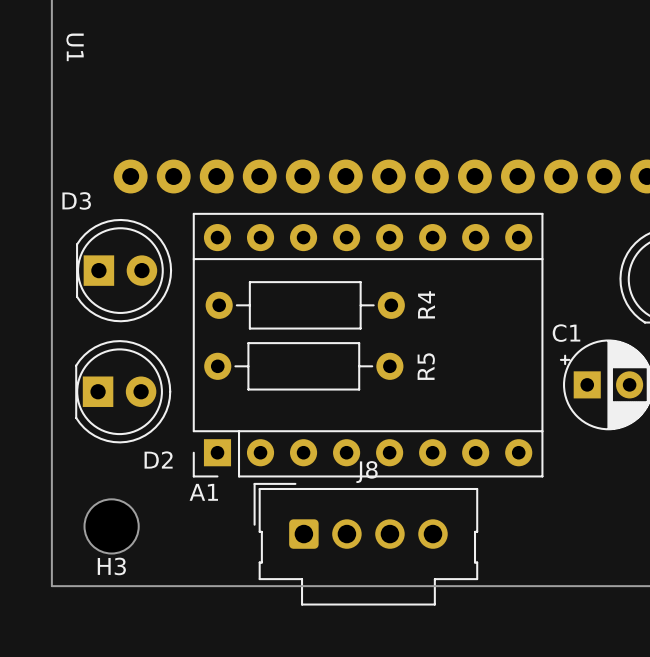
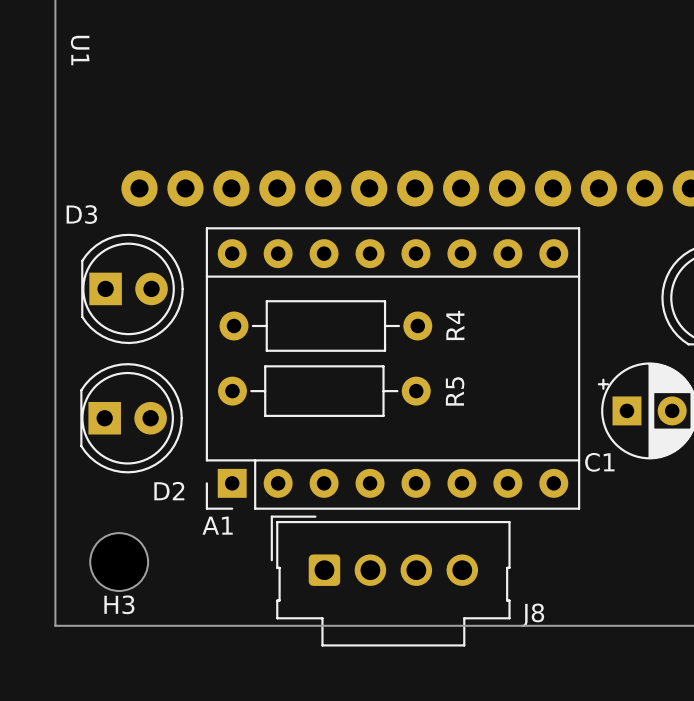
C1 name position: C1 (566, 333) -> C1 (599, 462)
J8 name position: J8 (367, 472) -> J8 (532, 615)

